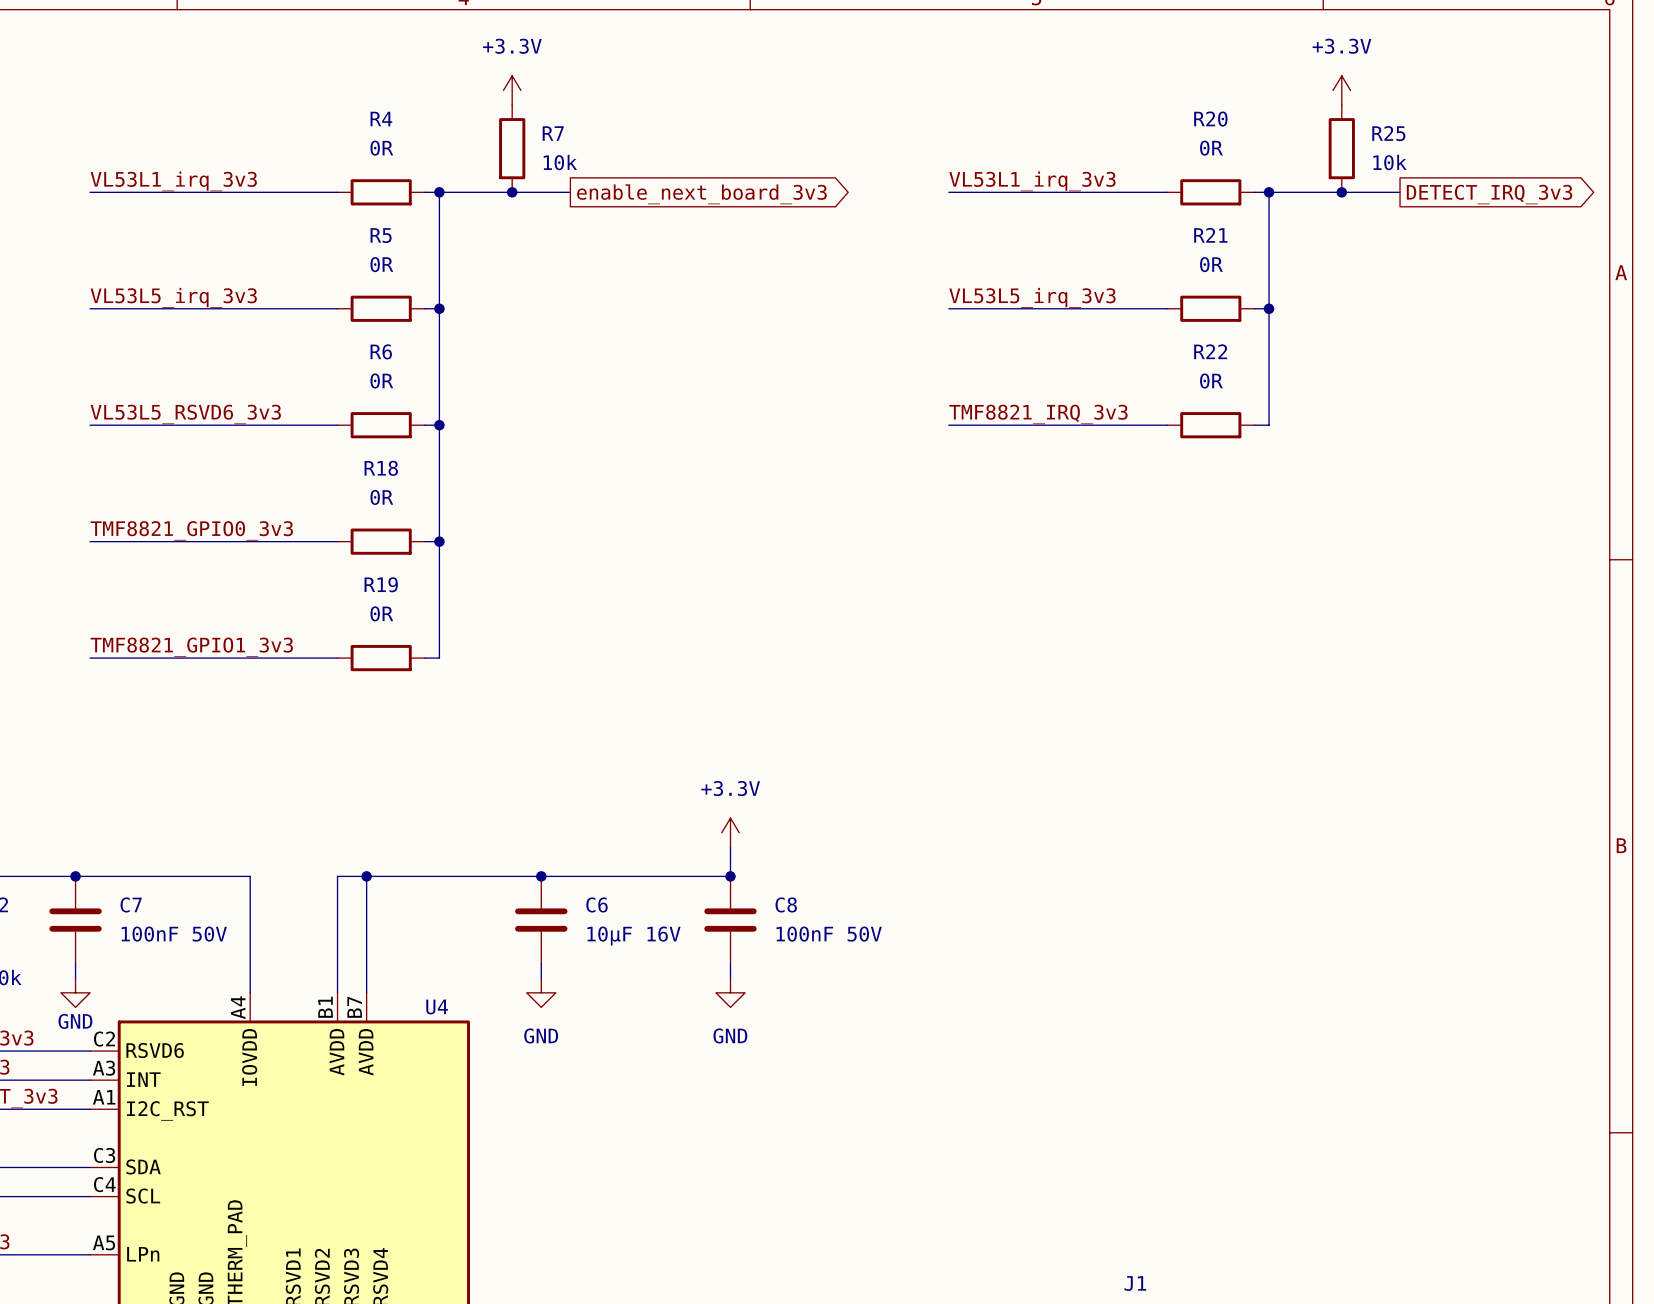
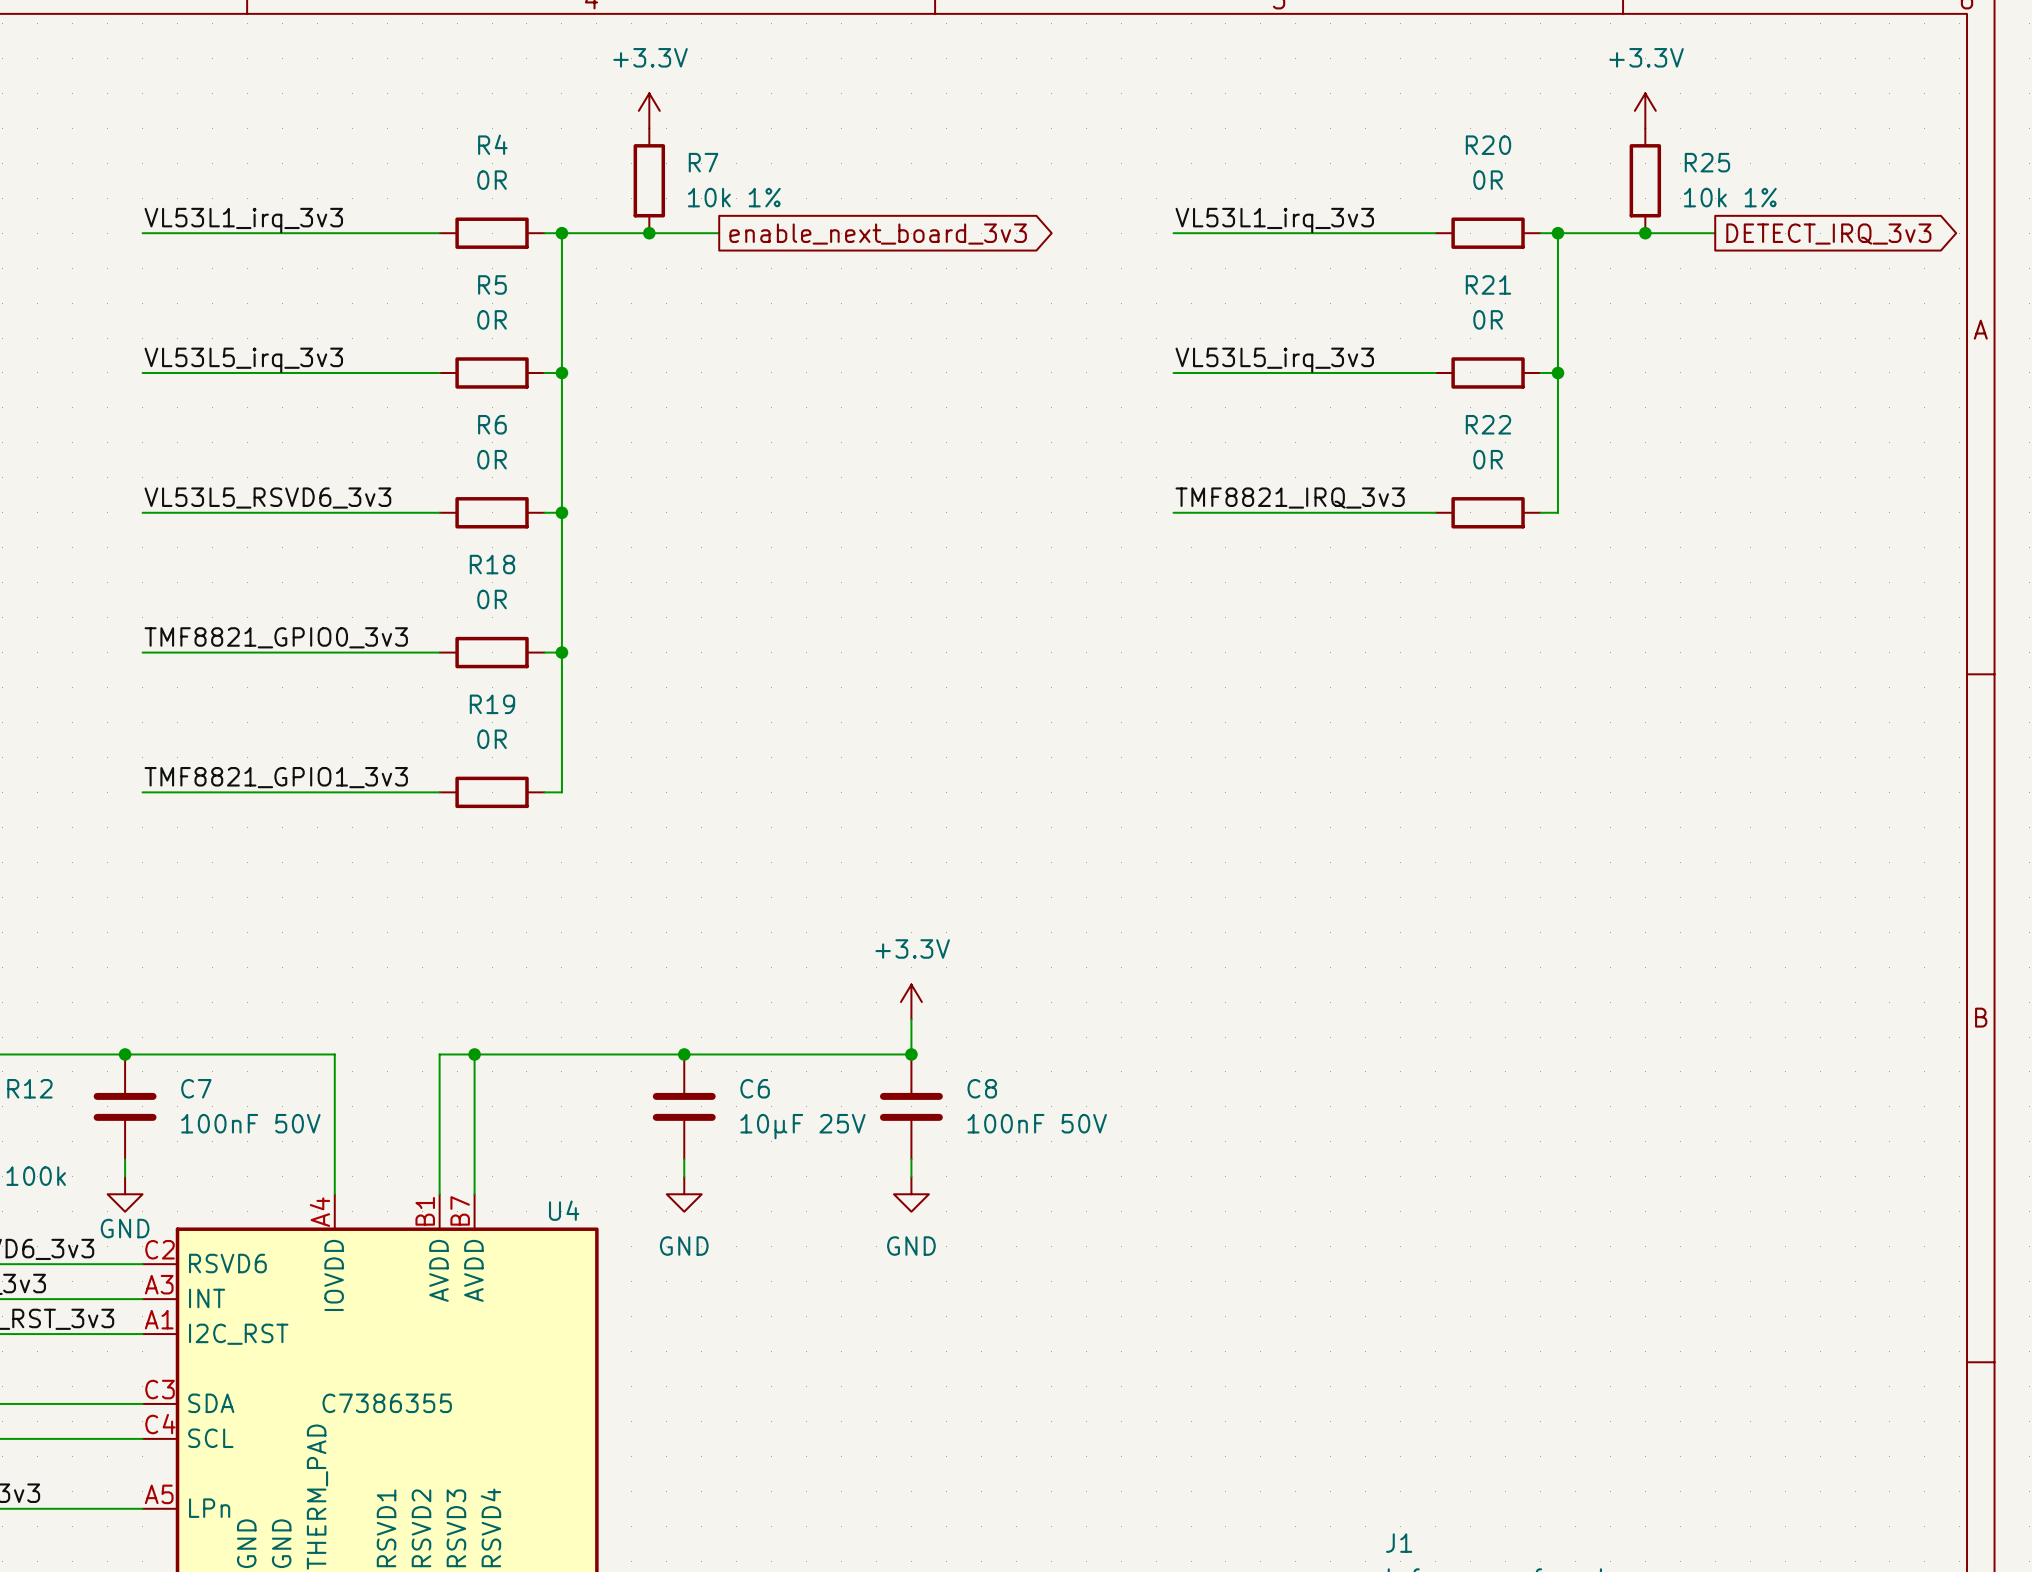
R7 value: 10k (560, 162) -> 10k 1% (734, 197)
R25 value: 10k (1389, 162) -> 10k 1% (1730, 197)
C6 value: 10µF 16V (633, 936) -> 10µF 25V (802, 1126)
U4 text: none -> C7386355 (387, 1403)

